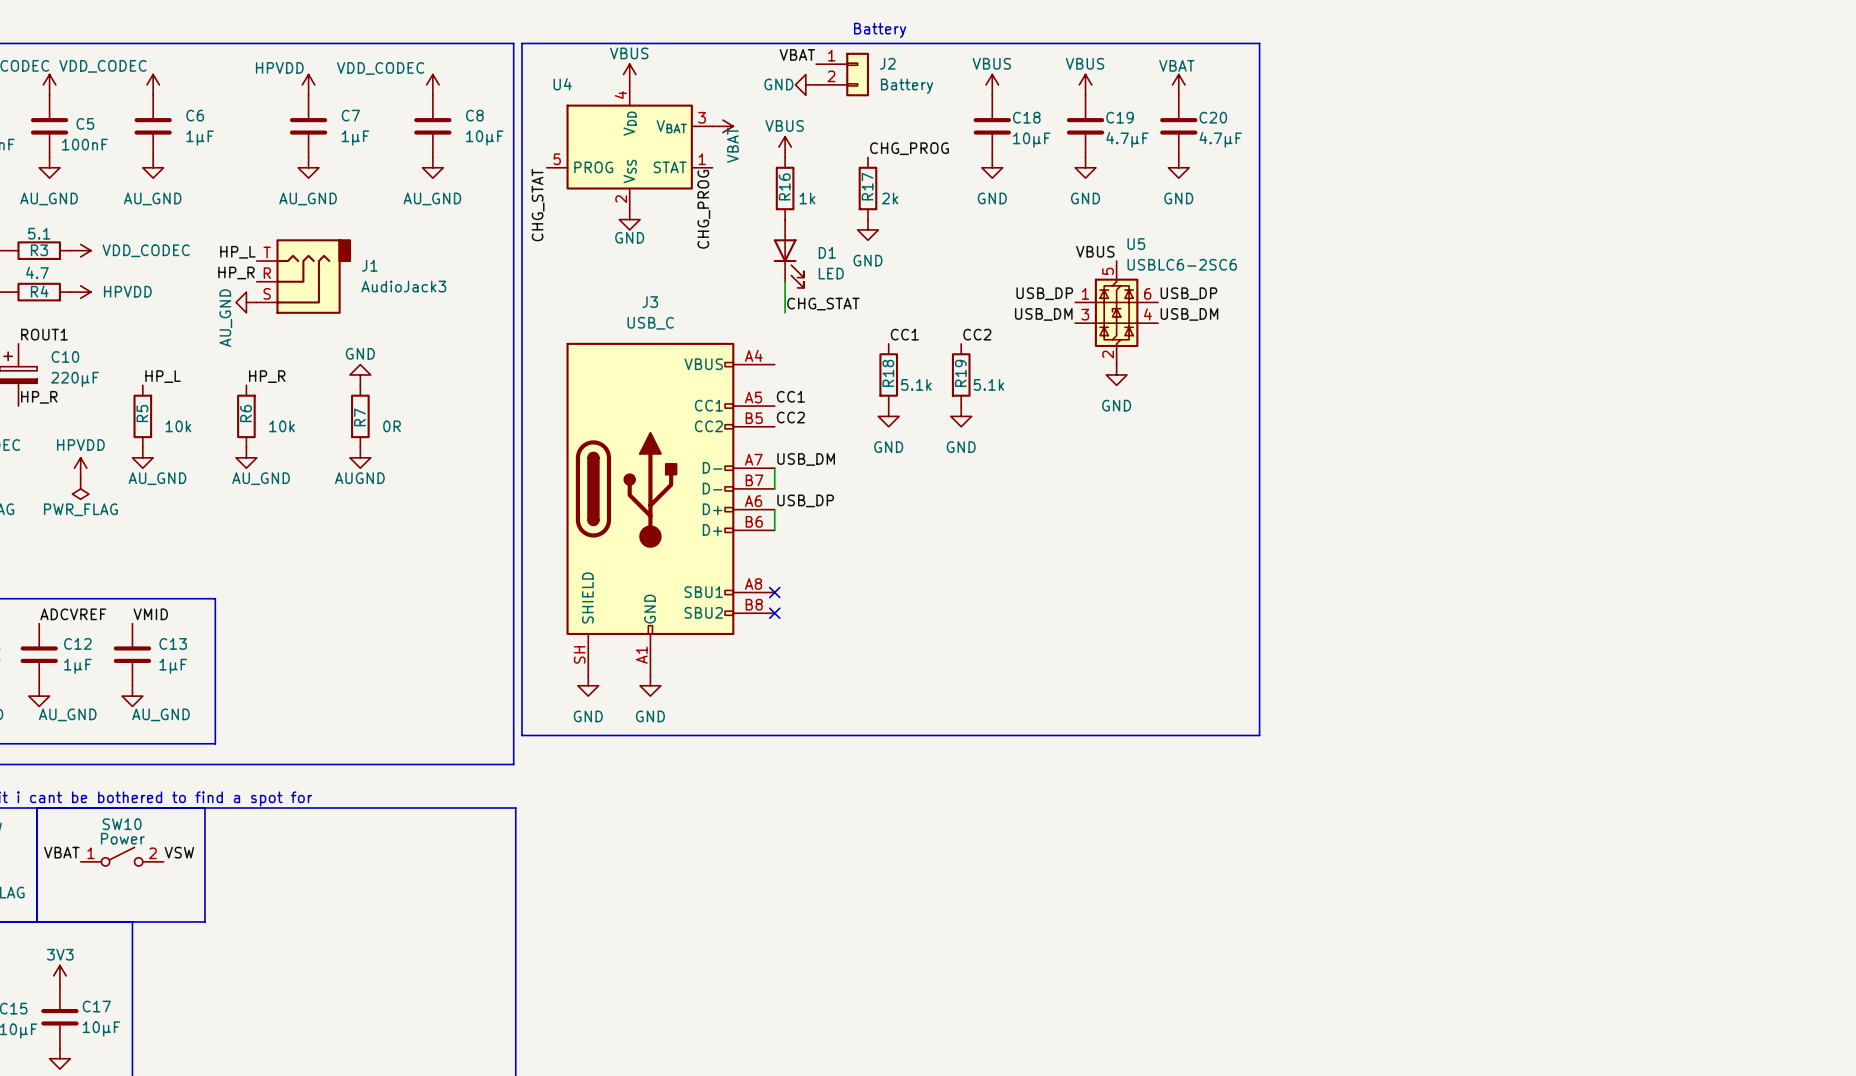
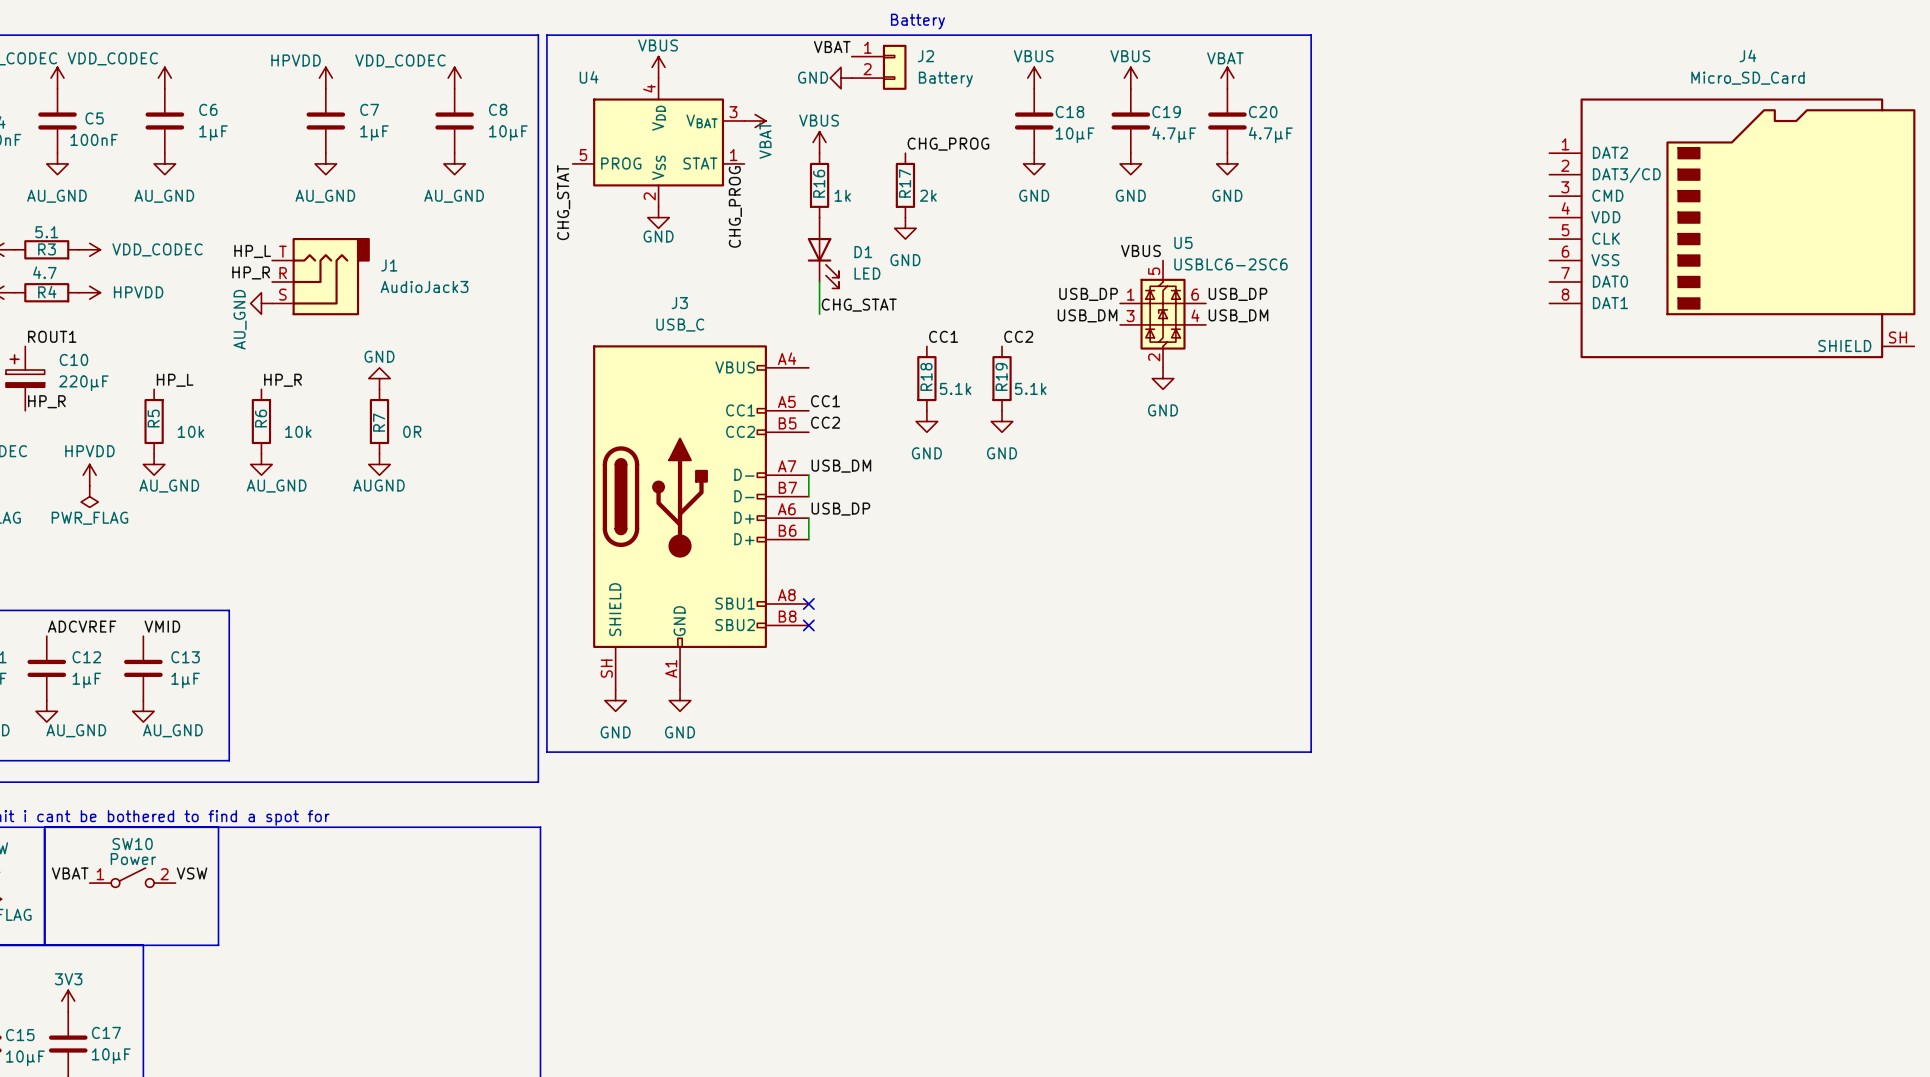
J4: none -> Micro_SD_Card (1732, 228)

